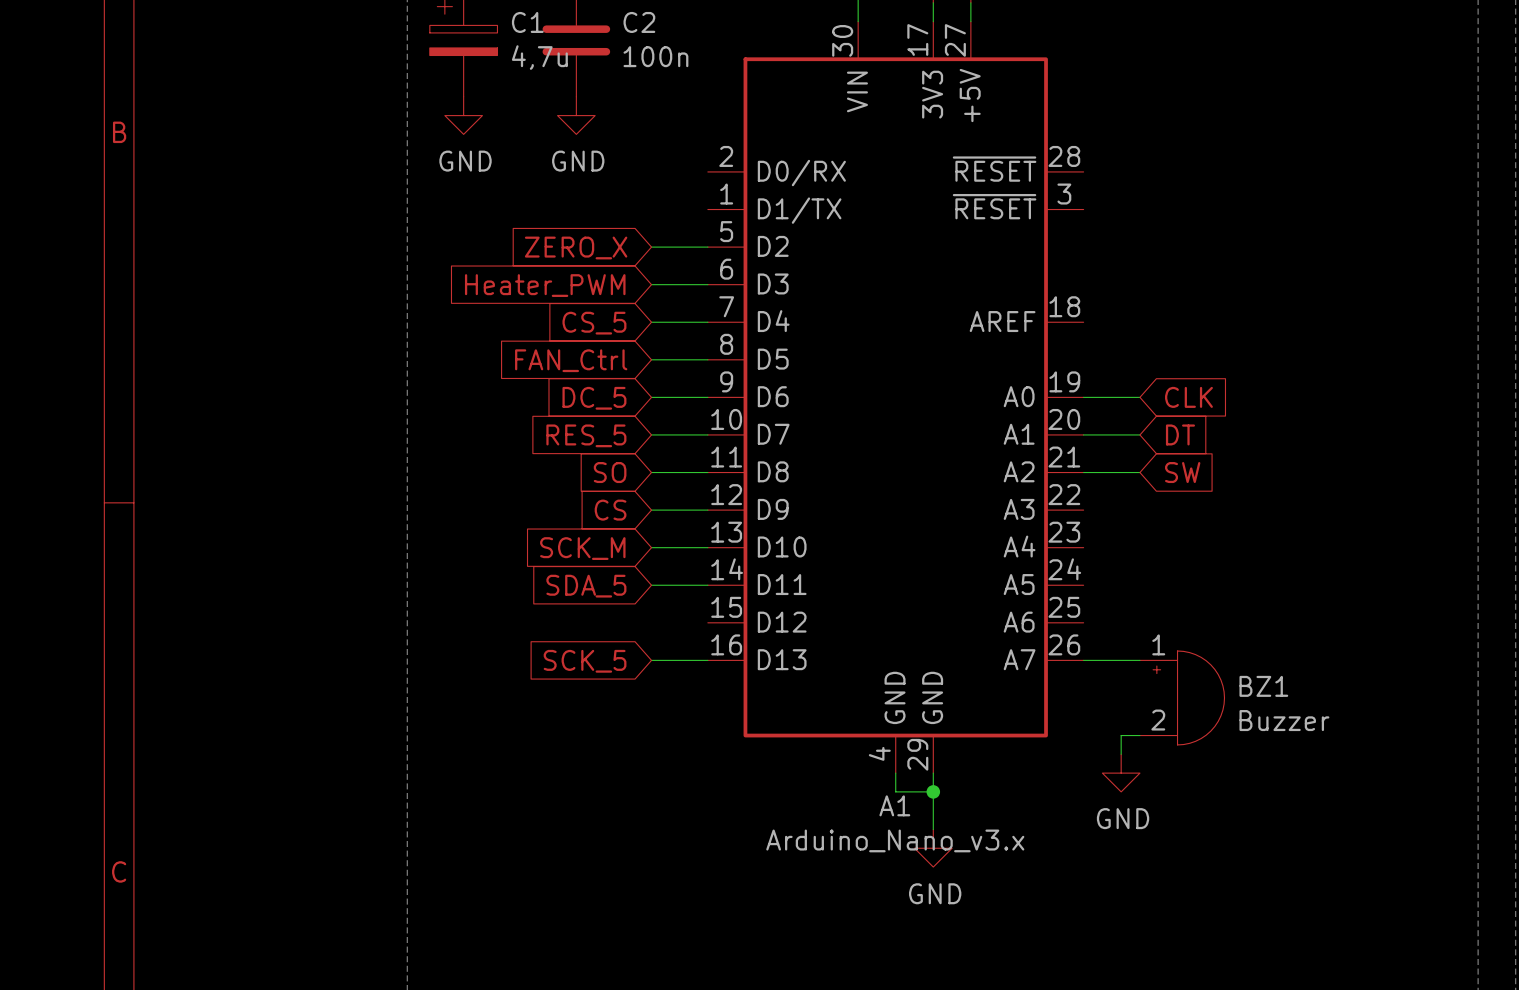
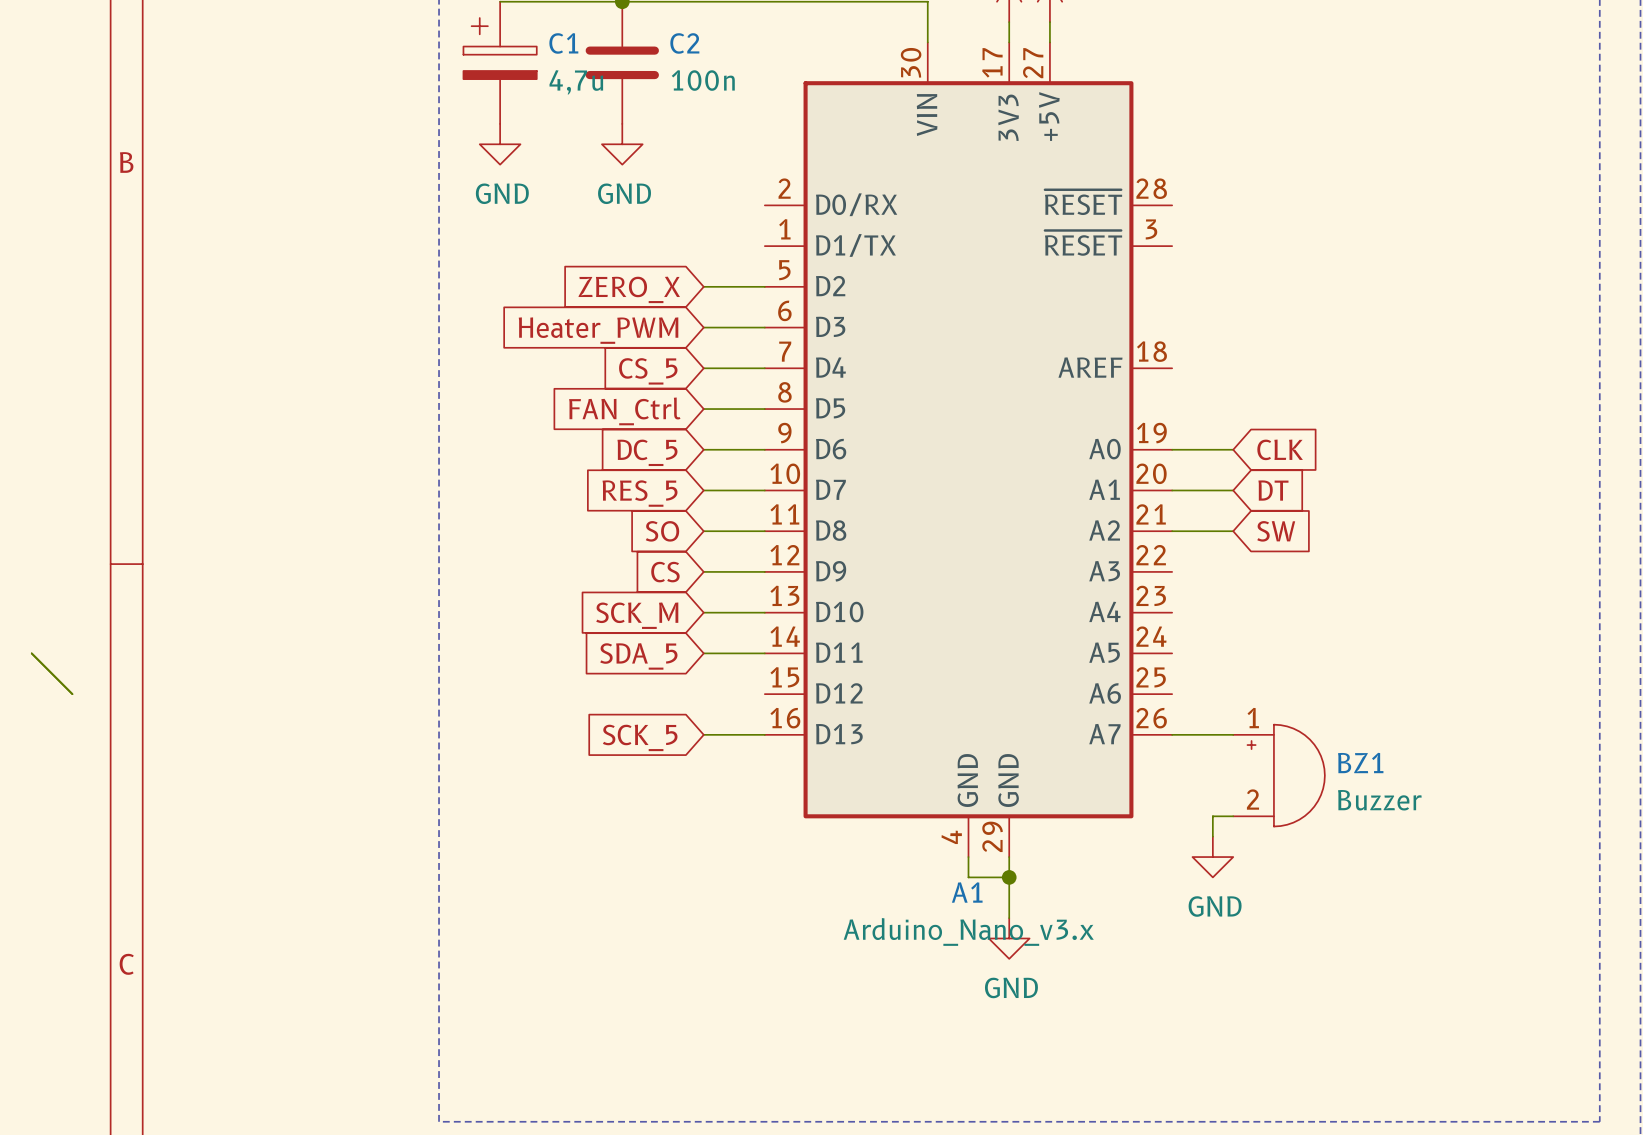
wire: none -> (31, 653) (72, 694)

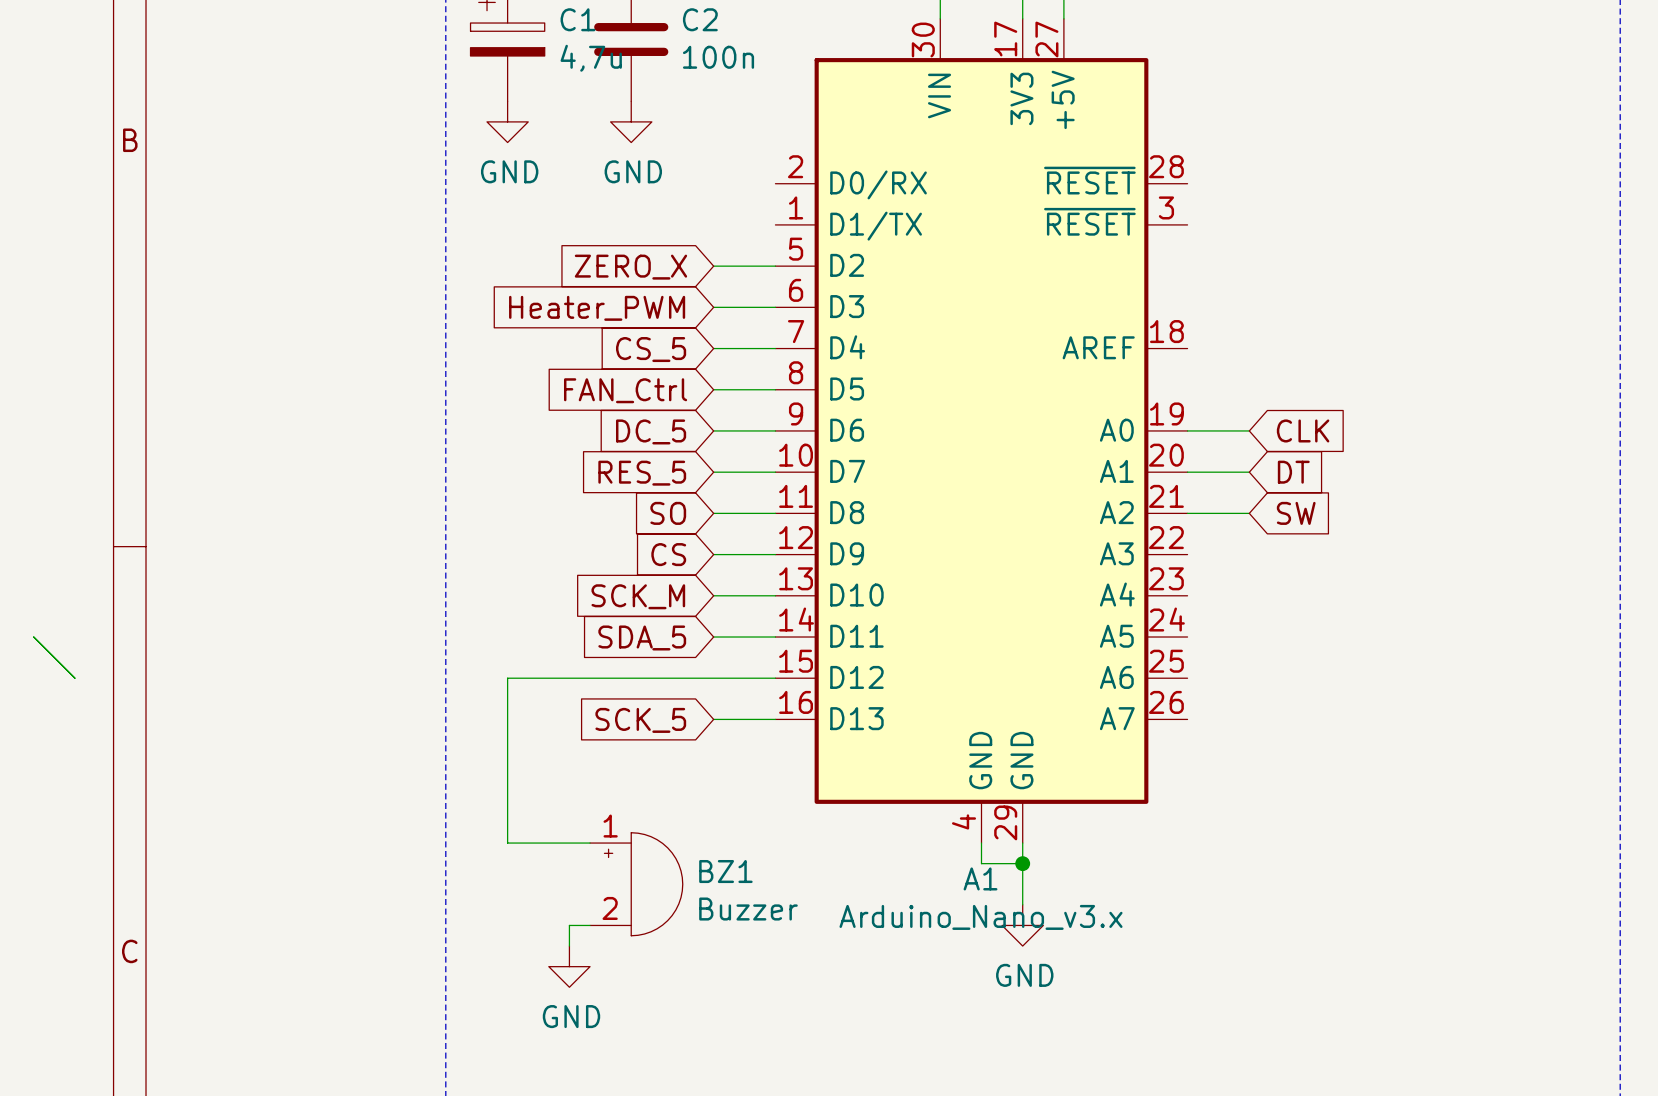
wire: none -> (775, 678) (507, 678) (507, 843) (590, 843)
wire: (1172, 734) (1233, 734) -> none
BZ1 position: (1279, 775) -> (636, 884)
wire: (1233, 816) (1212, 816) (1212, 836) -> none
power symbol: GND (1212, 857) -> none
wire: none -> (590, 925) (569, 925) (569, 946)
power symbol: none -> GND (569, 966)

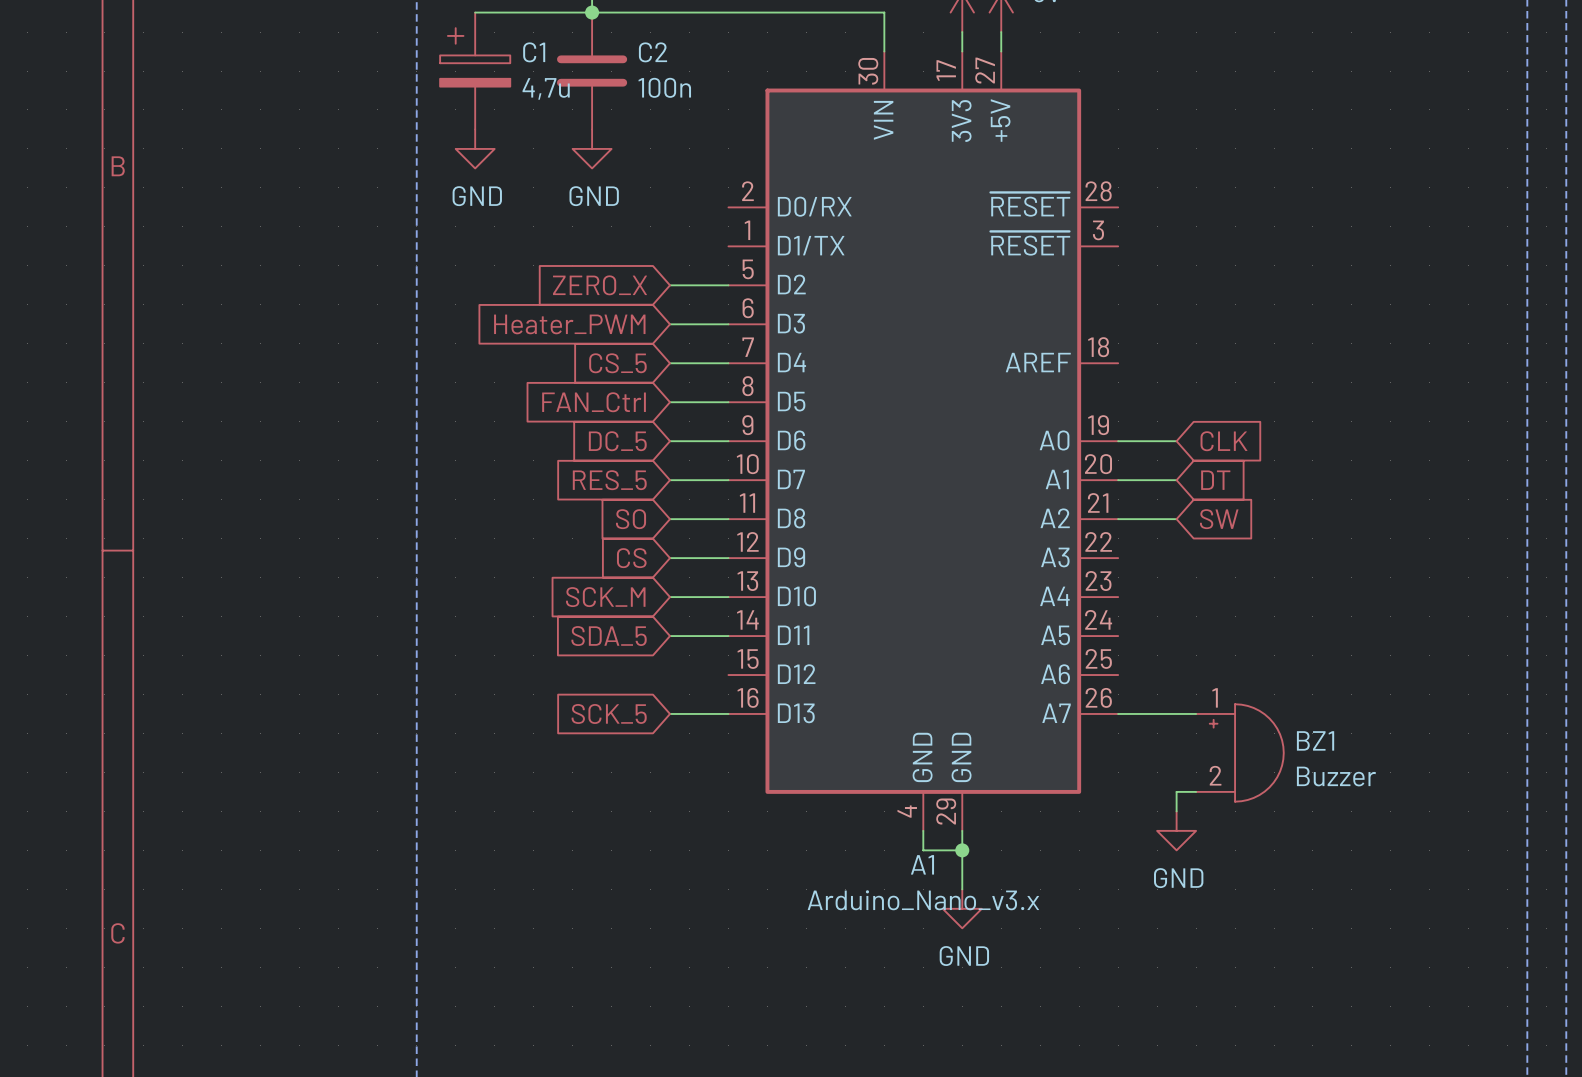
wire: (33, 637) (74, 678) -> none
wire: (775, 678) (507, 678) (507, 843) (590, 843) -> none
wire: none -> (1118, 713) (1196, 713)
wire: none -> (1196, 791) (1176, 791) (1176, 811)
power symbol: none -> GND (1176, 830)
BZ1 position: (636, 884) -> (1239, 752)
wire: (590, 925) (569, 925) (569, 946) -> none
power symbol: GND (569, 966) -> none

